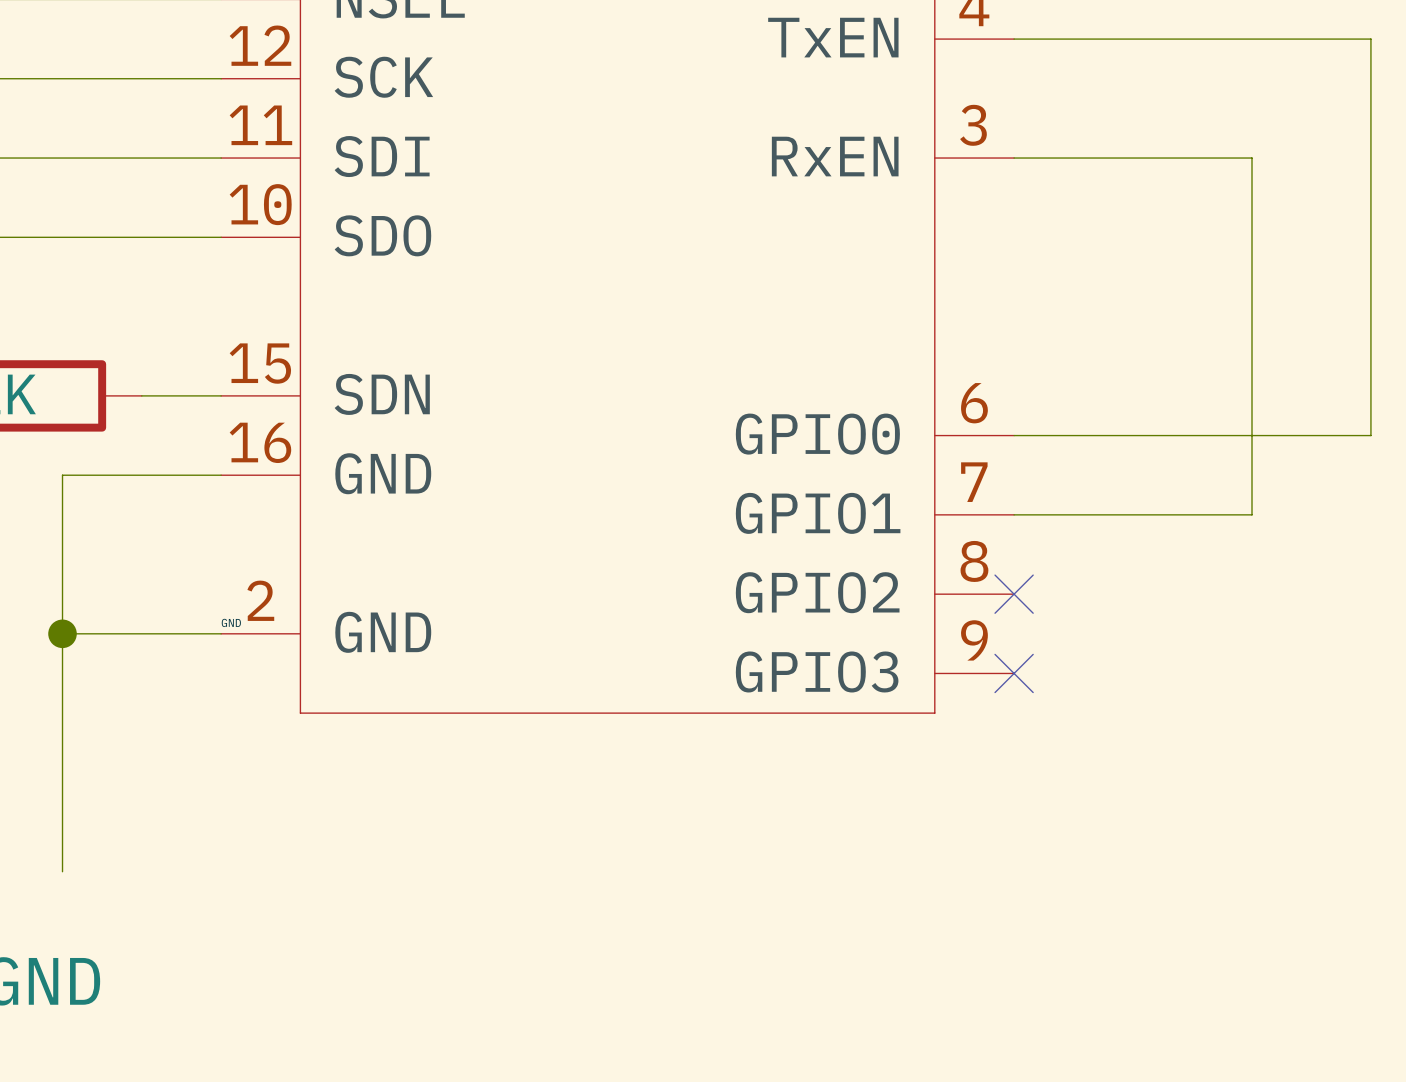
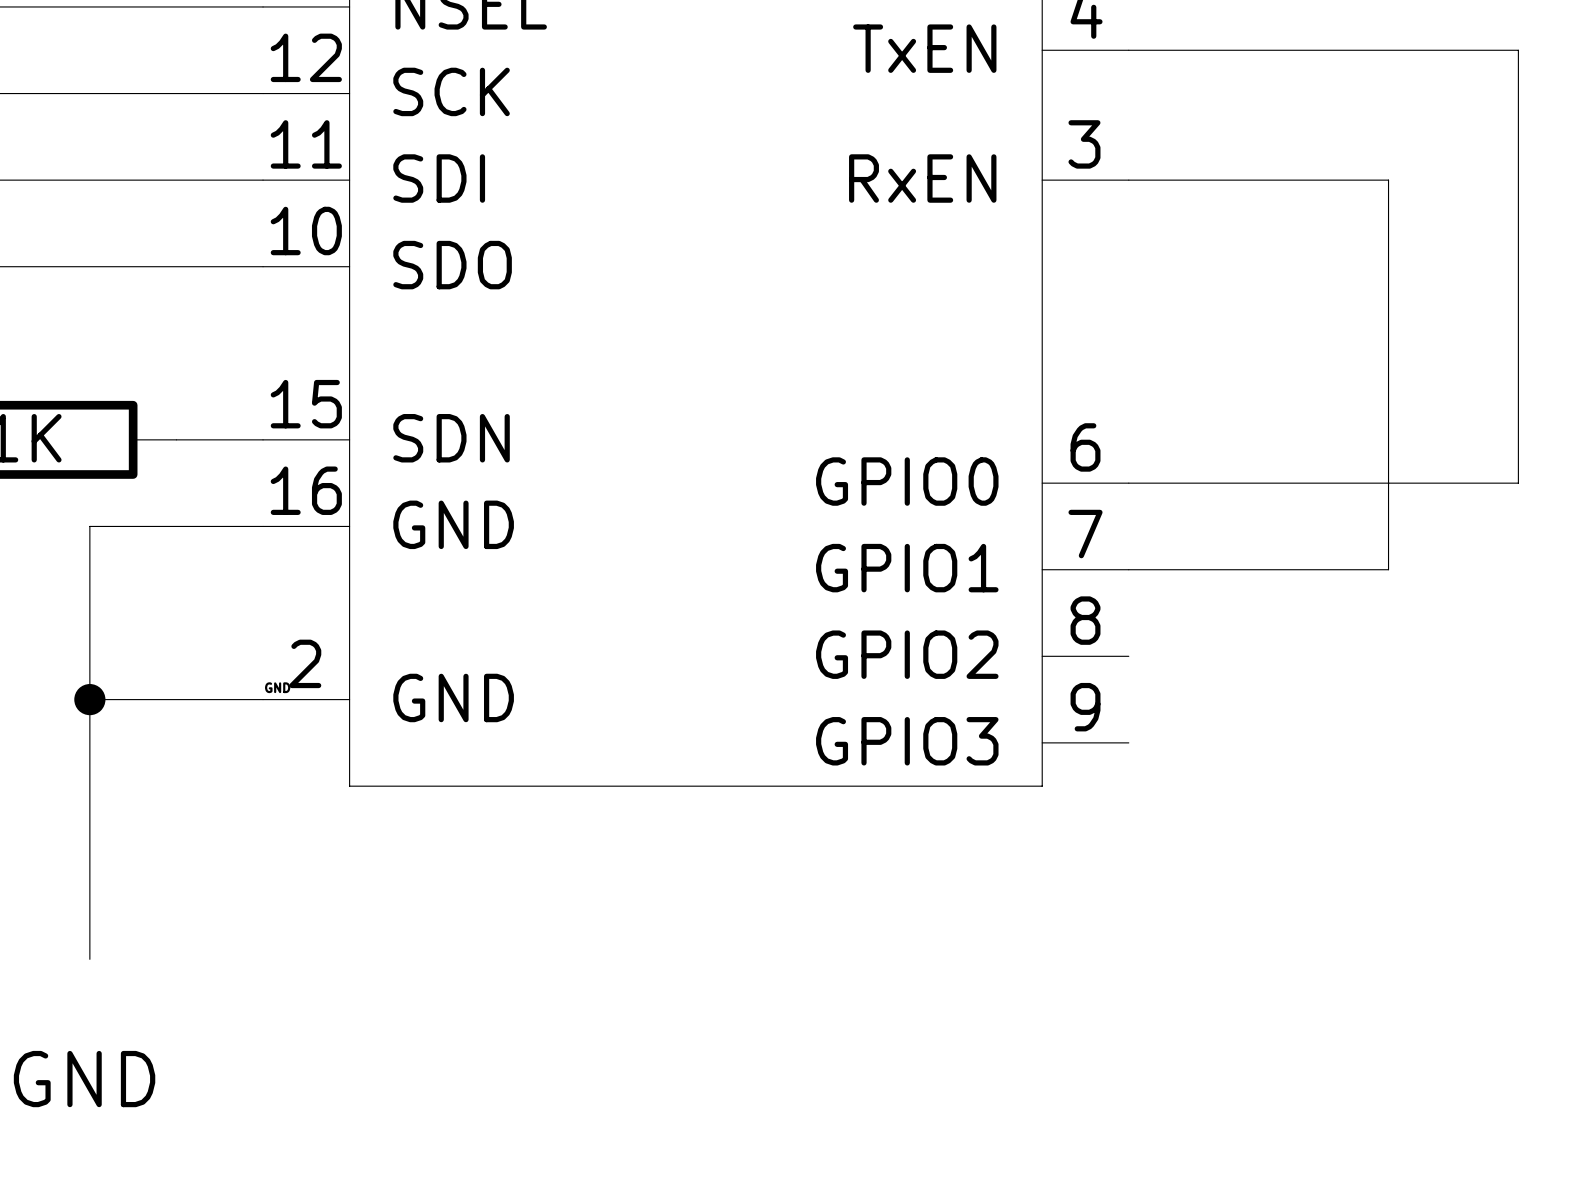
no-connect mark: (1014, 594) -> none
no-connect mark: (1014, 673) -> none

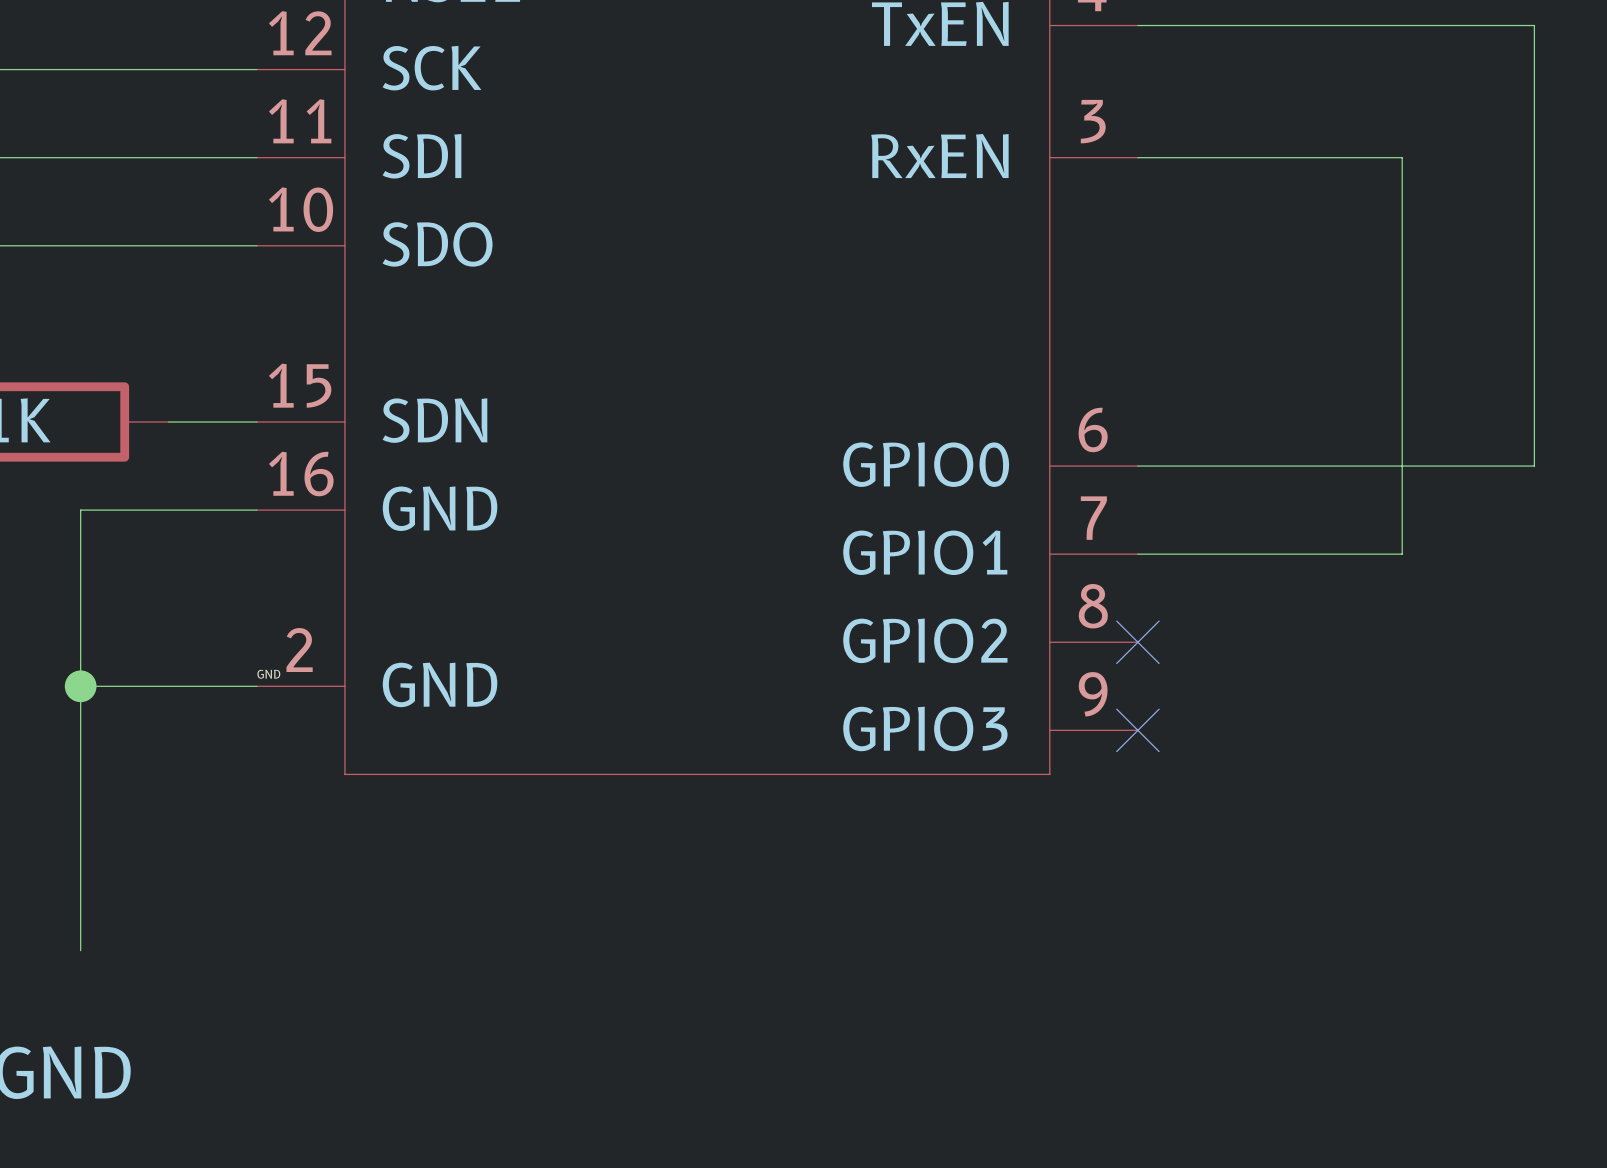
no-connect mark: none -> (1137, 642)
no-connect mark: none -> (1137, 730)

